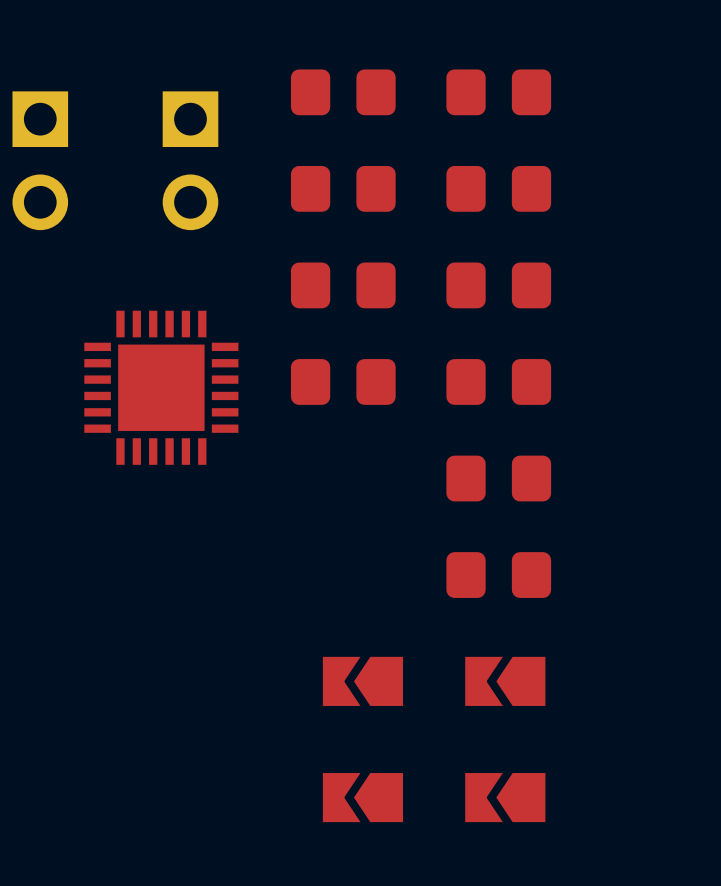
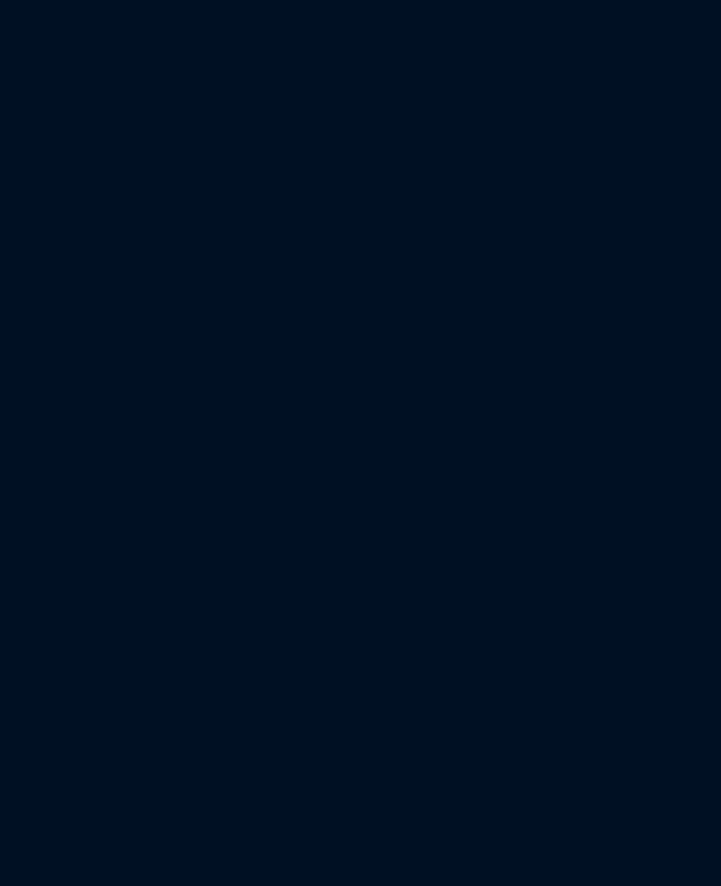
part: (343, 92) -> none
part: (498, 92) -> none
part: (40, 160) -> none
part: (190, 160) -> none
part: (343, 188) -> none
part: (498, 188) -> none
part: (343, 285) -> none
part: (498, 285) -> none
part: (343, 381) -> none
part: (498, 381) -> none
part: (161, 387) -> none
part: (498, 478) -> none
part: (498, 575) -> none
part: (362, 681) -> none
part: (505, 681) -> none
part: (362, 797) -> none
part: (505, 797) -> none

